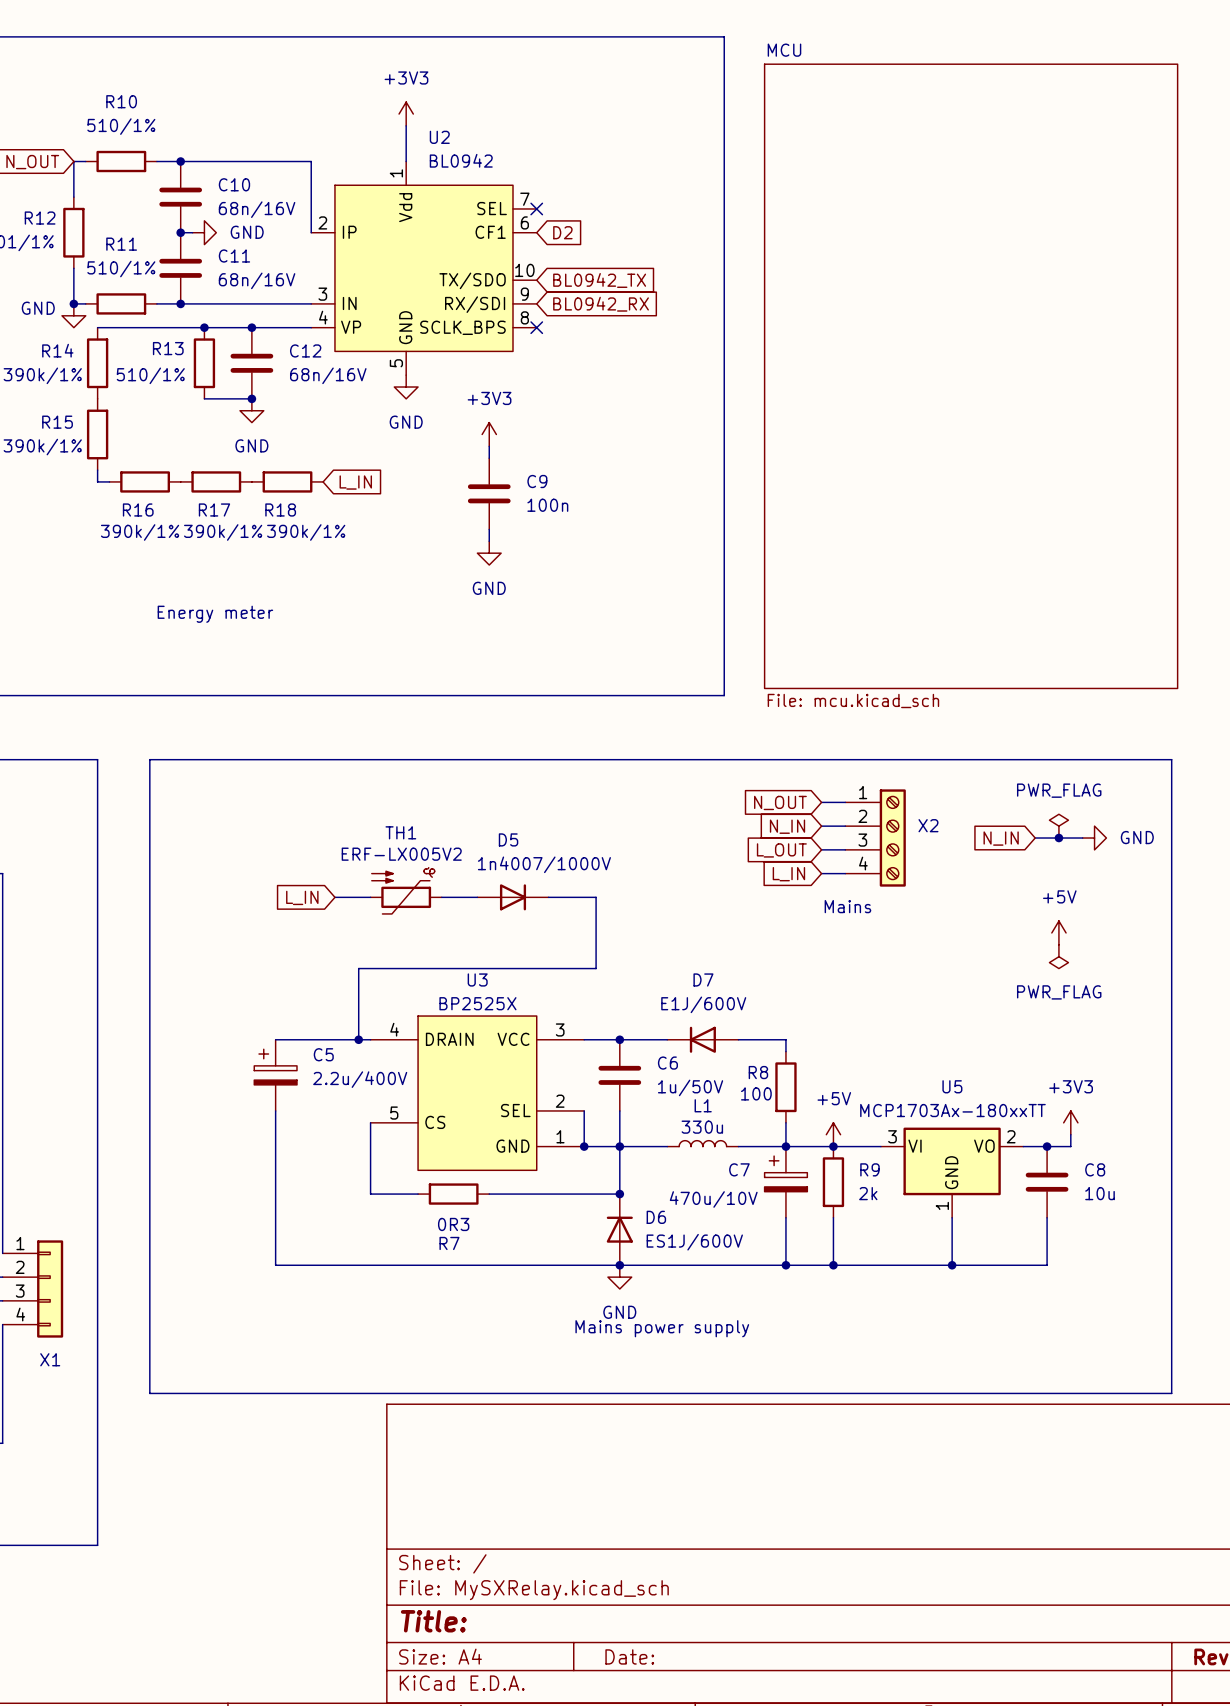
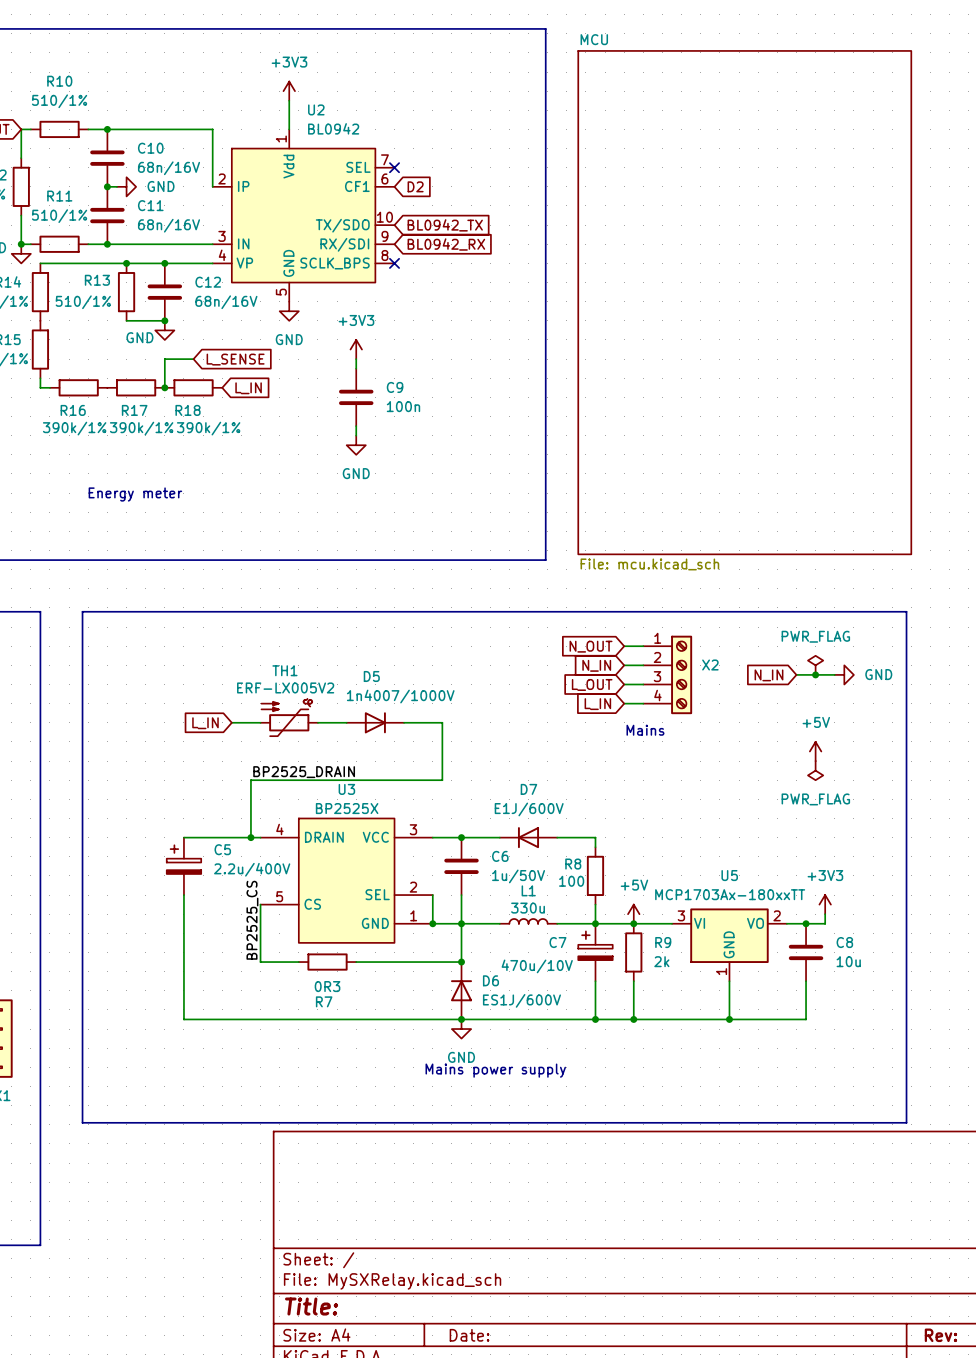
power symbol text position: GND (251, 445) -> GND (139, 337)
wire: none -> (193, 359) (164, 359) (164, 387)
global label: none -> L_SENSE (235, 359)
junction: none -> (164, 387)
label: none -> BP2525_DRAIN (304, 772)
label: none -> BP2525_CS (252, 920)

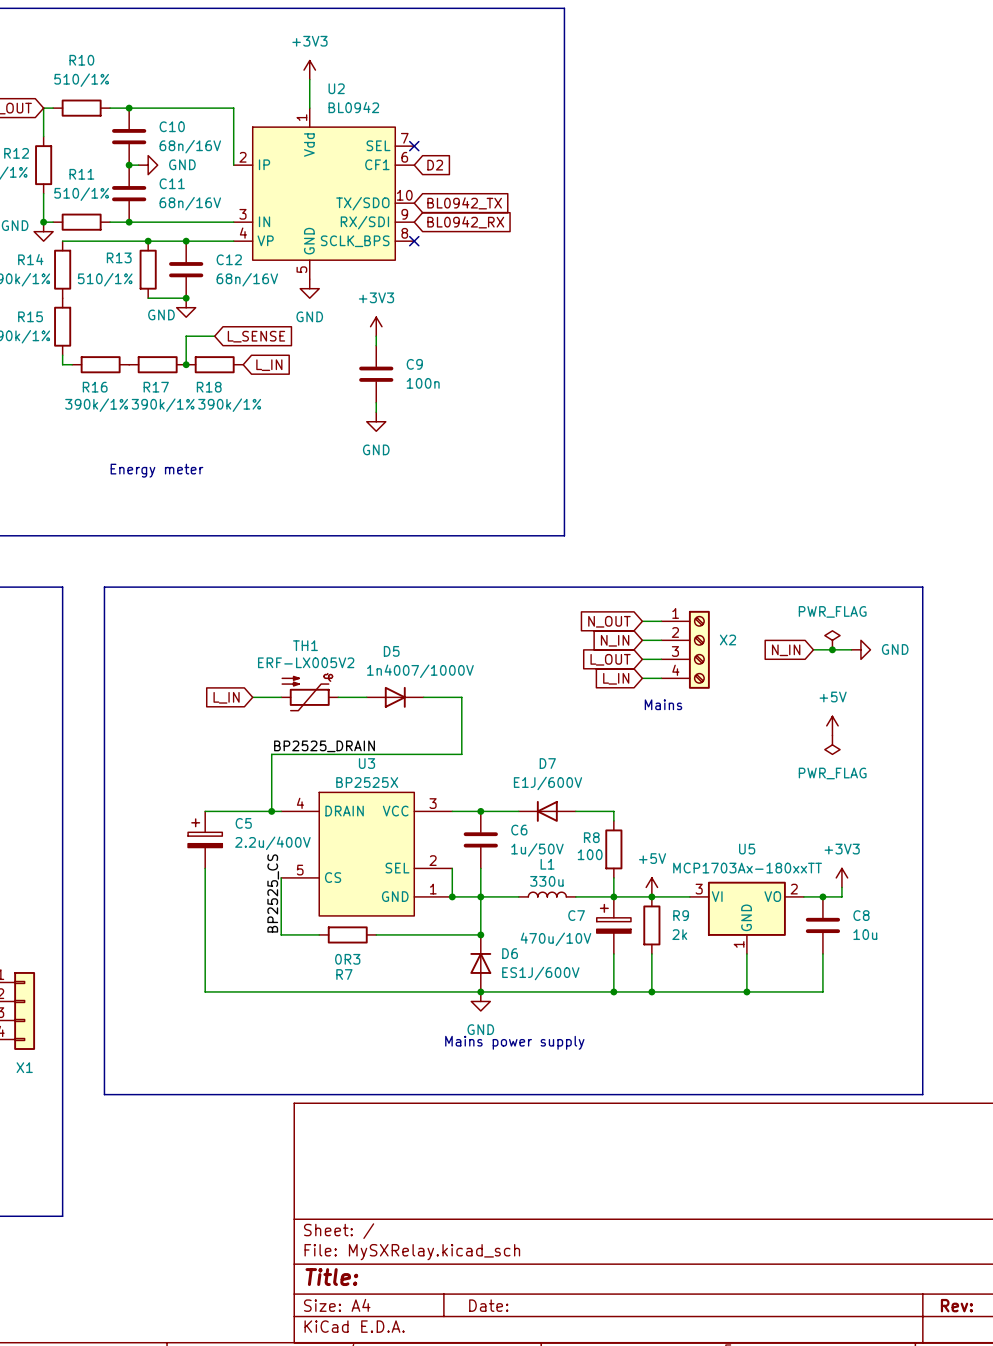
sheet MCU: File: mcu.kicad_sch (744, 302) -> none

